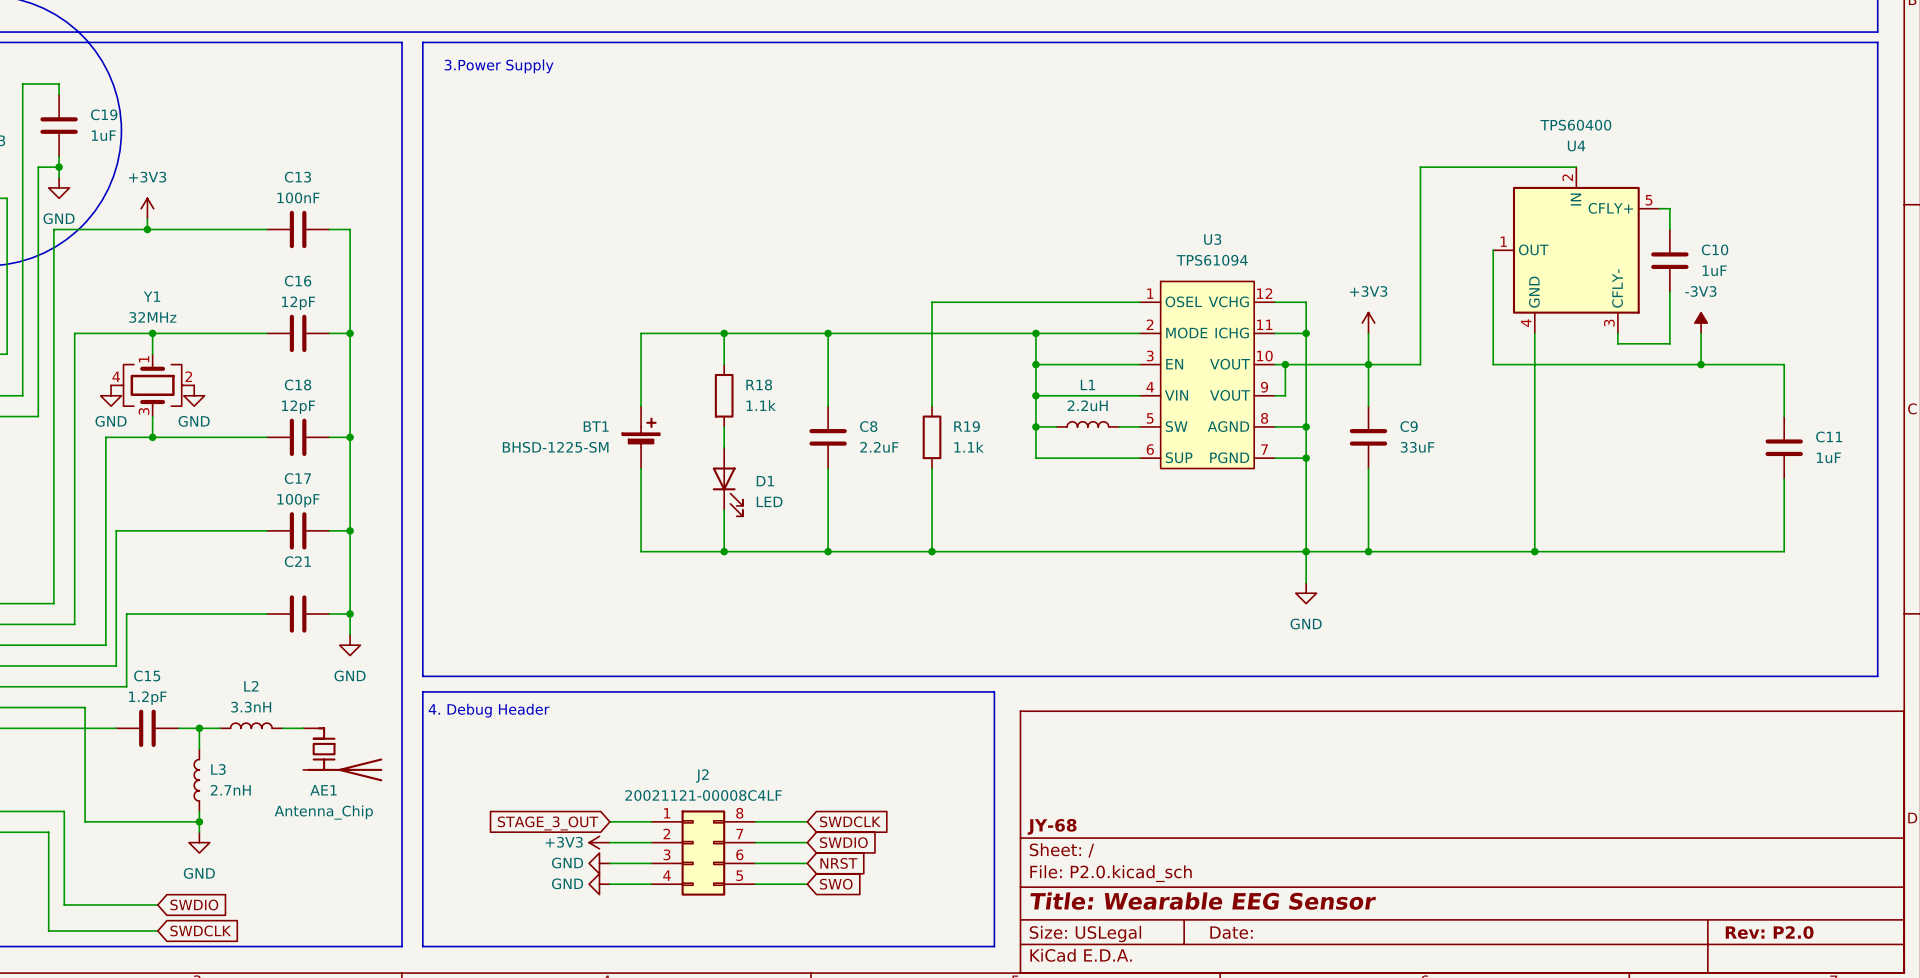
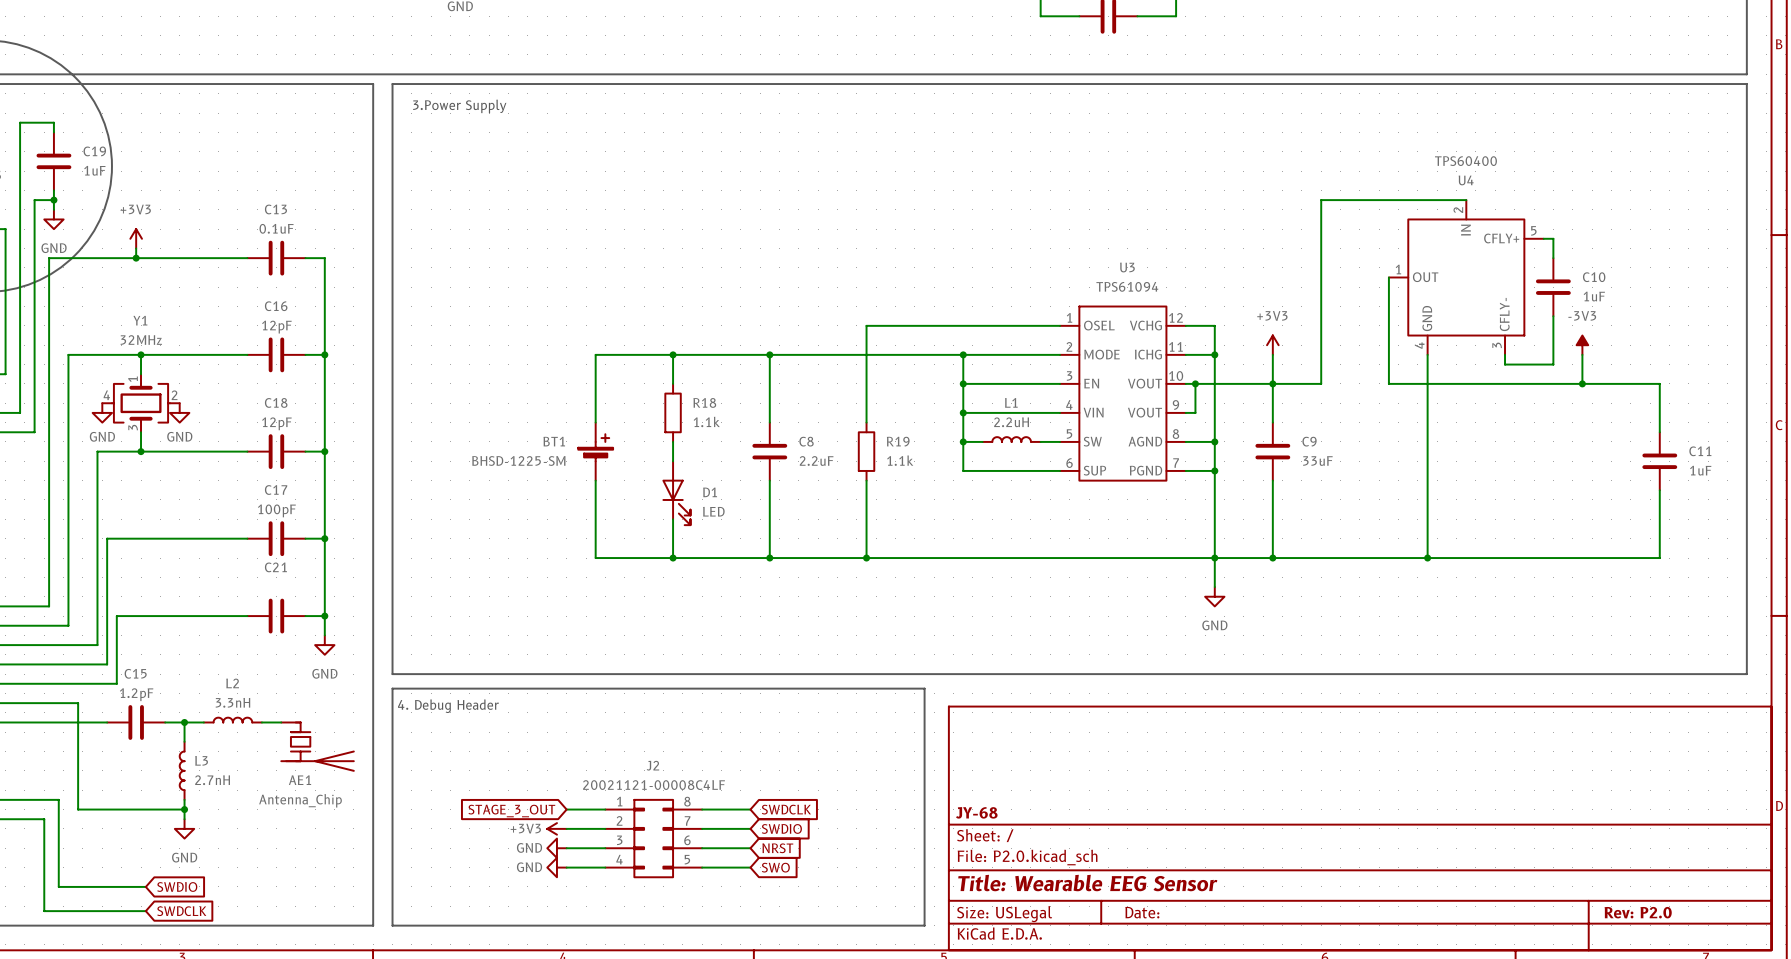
C13 value: 100nF (298, 197) -> 0.1uF (276, 228)

